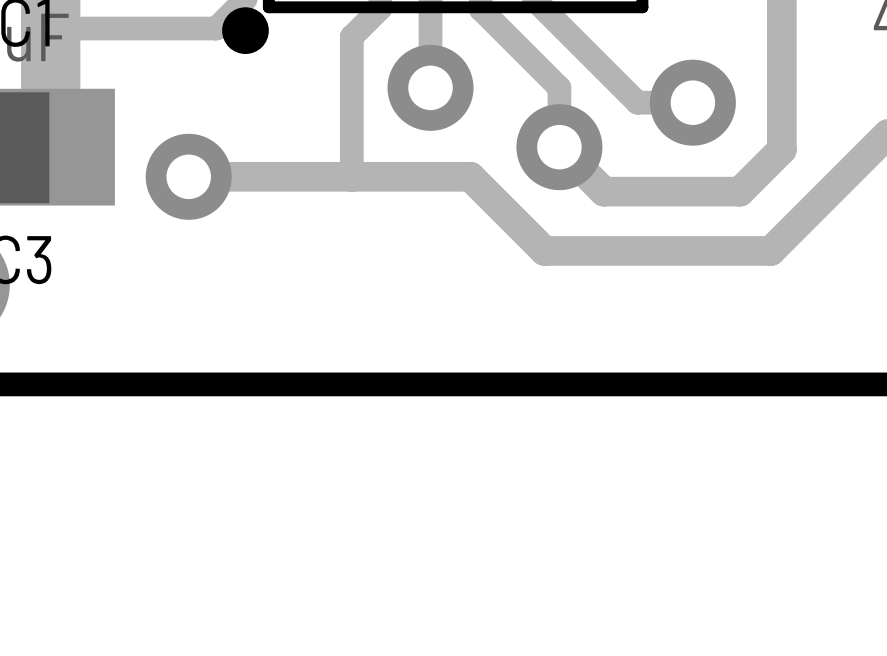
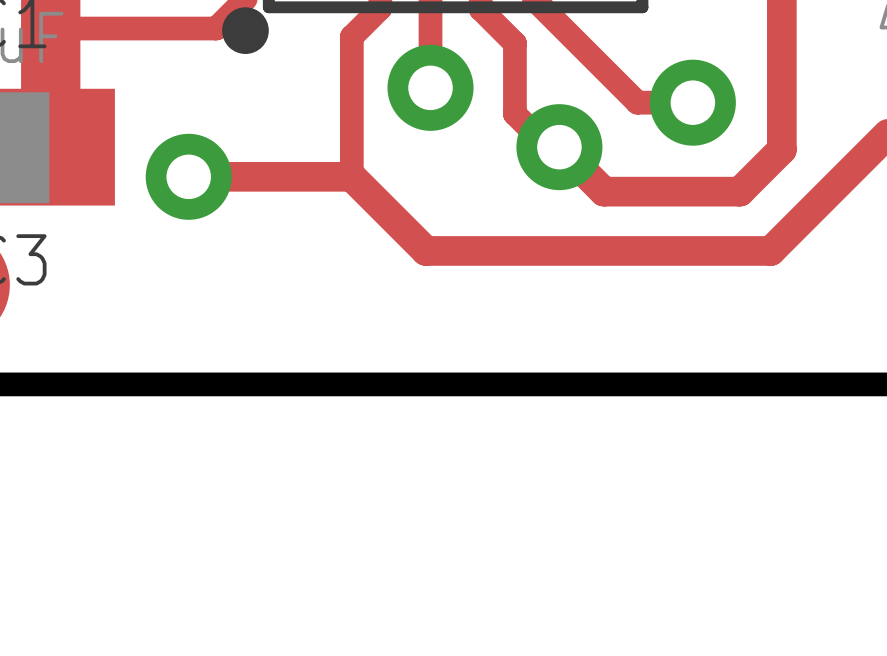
track: (514, 43) (559, 87) (559, 147) -> (514, 43) (514, 114) (548, 147) (559, 147)
track: (351, 176) (470, 176) (544, 250) -> (351, 176) (425, 250) (544, 250)

